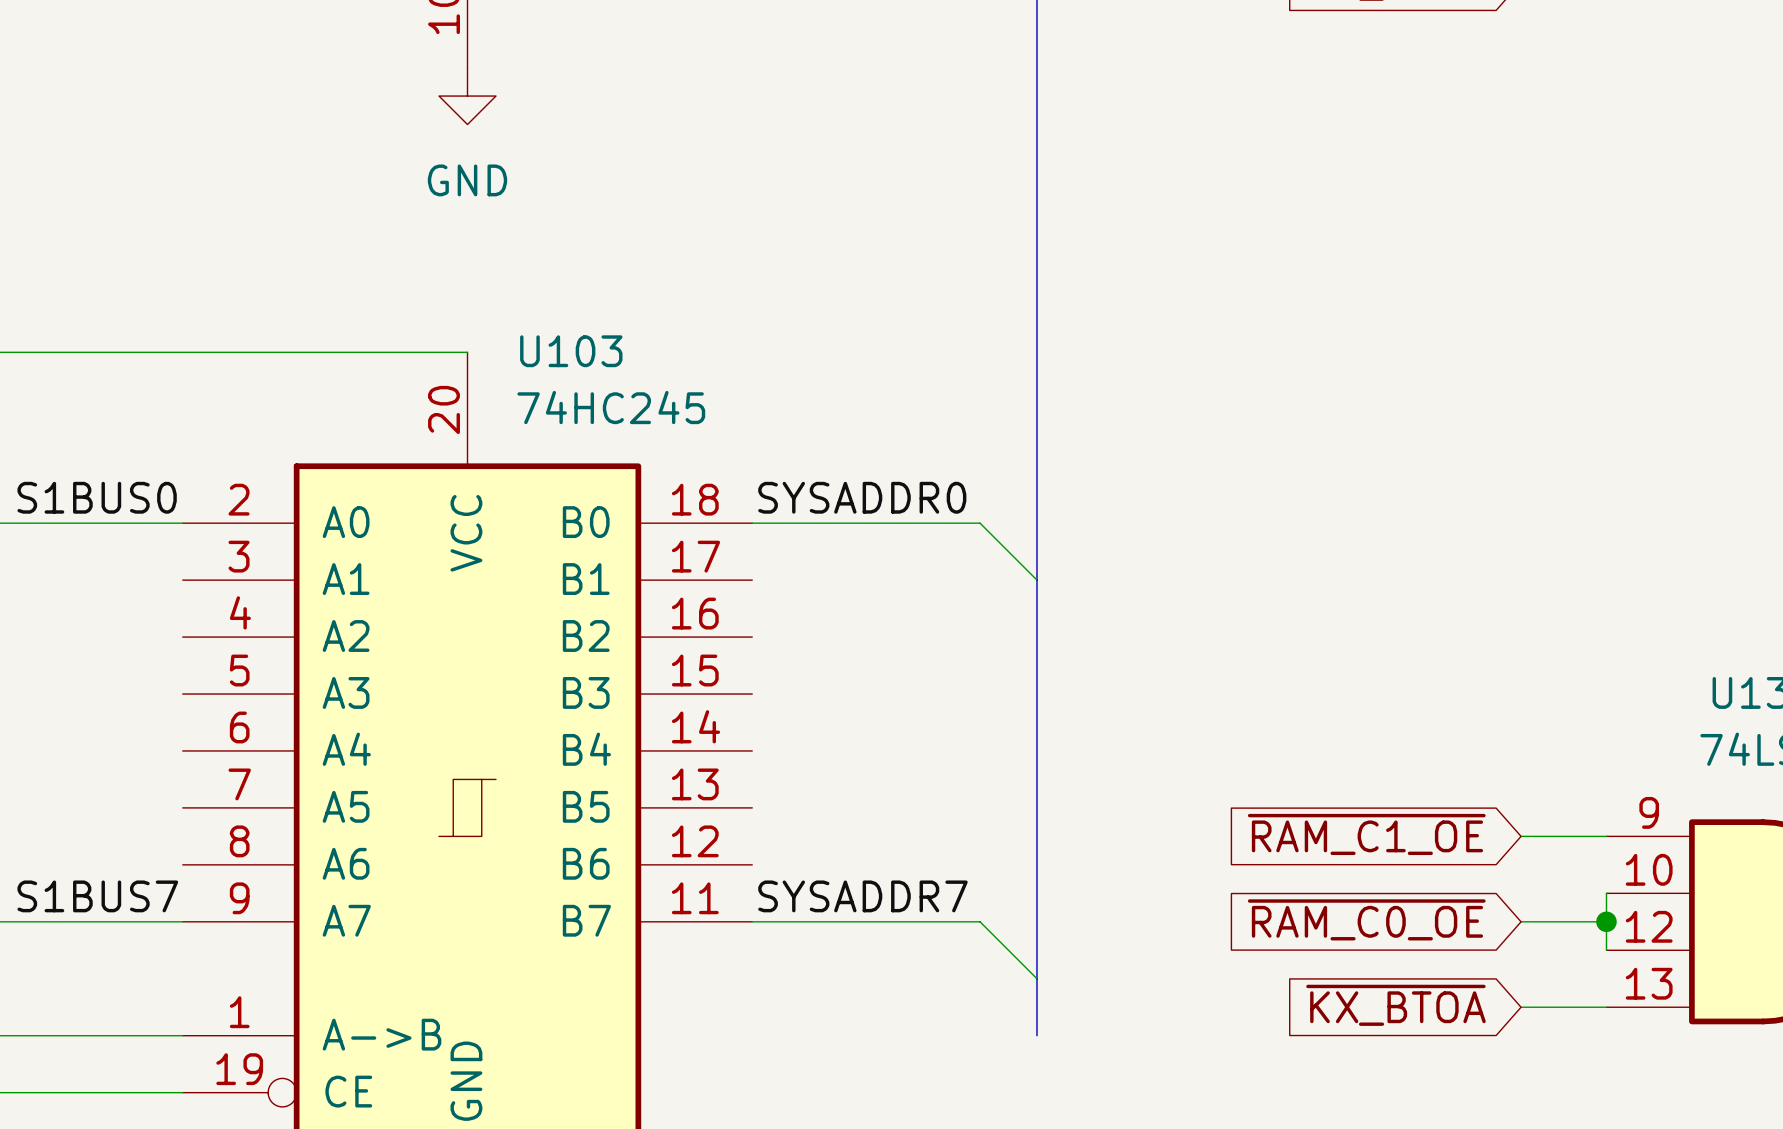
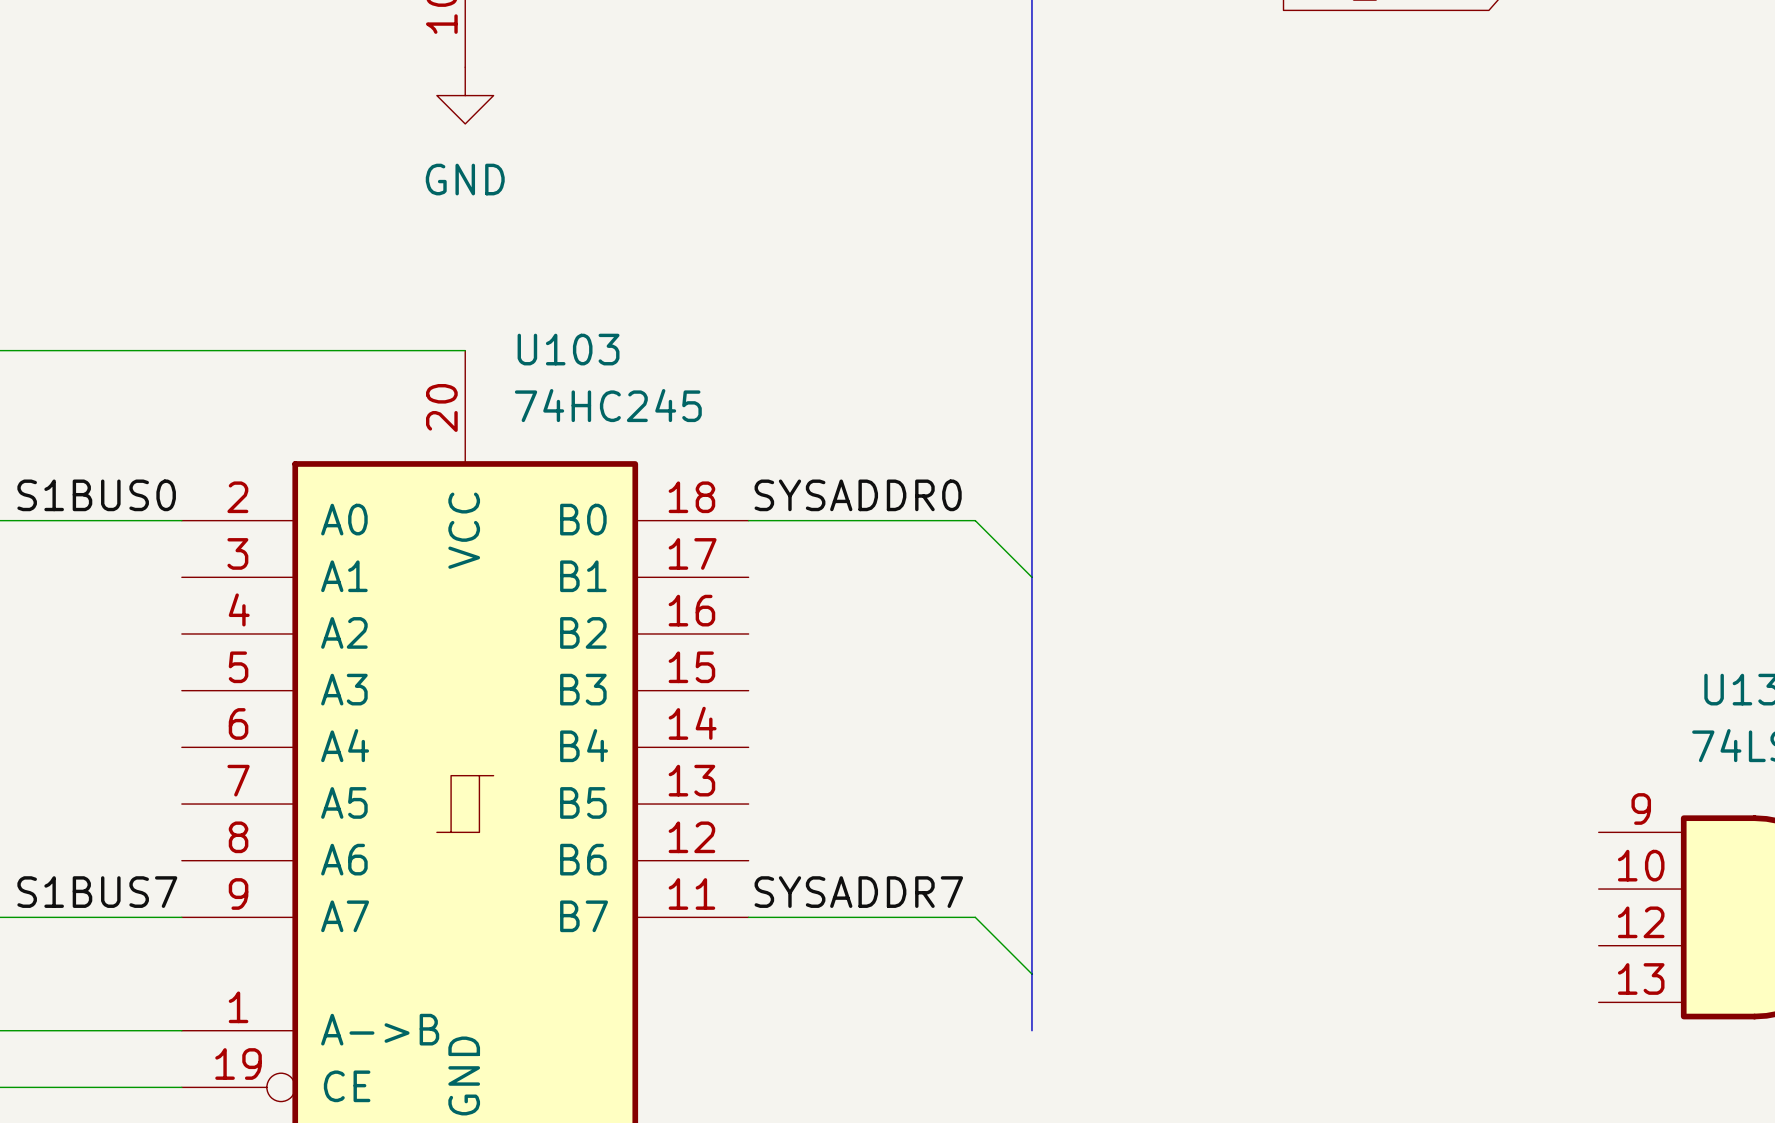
global label: ~{RAM_C1_OE} (1366, 834) -> none
wire: (1521, 836) (1606, 836) -> none
wire: (1606, 893) (1606, 950) -> none
global label: ~{RAM_C0_OE} (1366, 919) -> none
wire: (1521, 921) (1606, 921) -> none
junction: (1606, 921) -> none
global label: ~{KX_BTOA} (1395, 1005) -> none
wire: (1521, 1007) (1606, 1007) -> none

